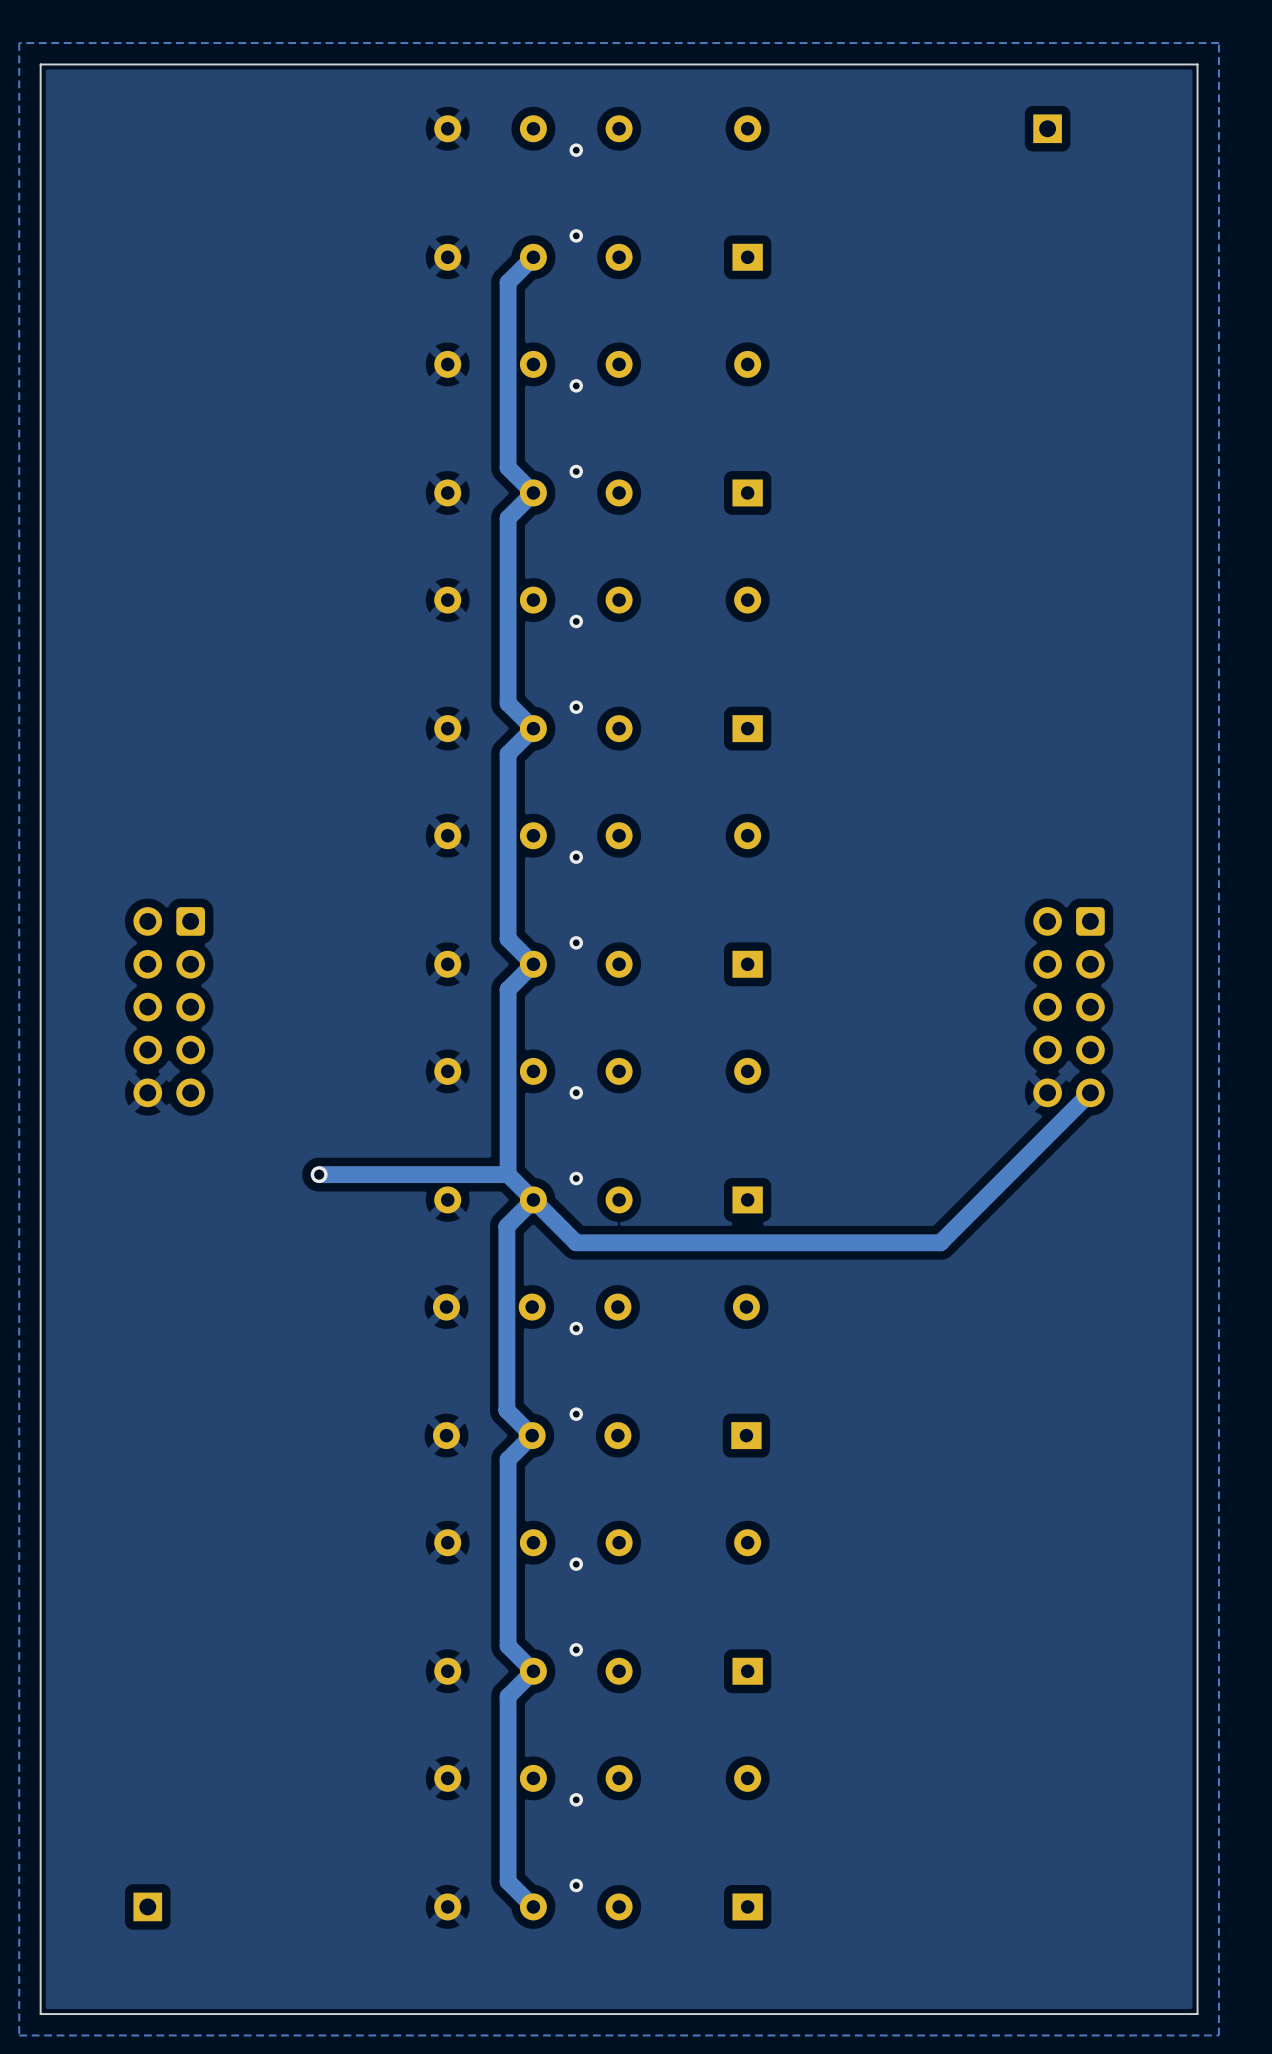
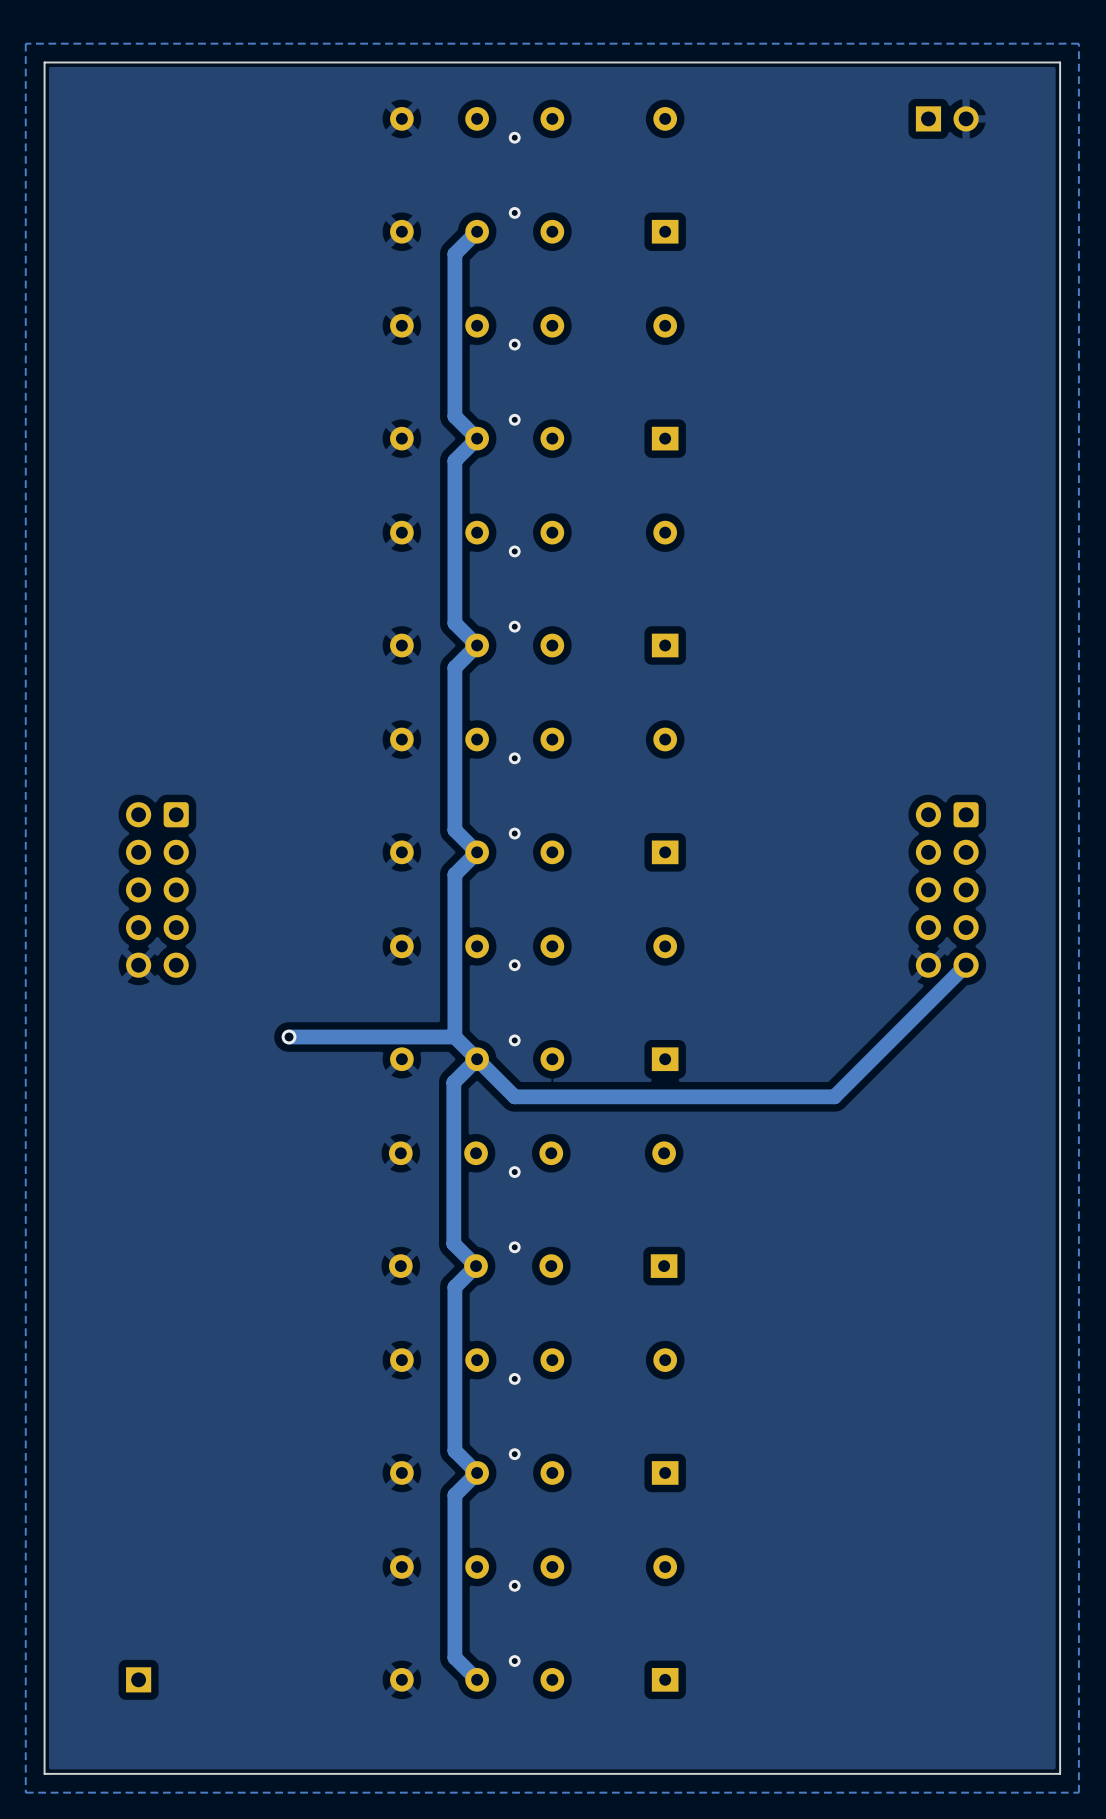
part: none -> (947, 118)

